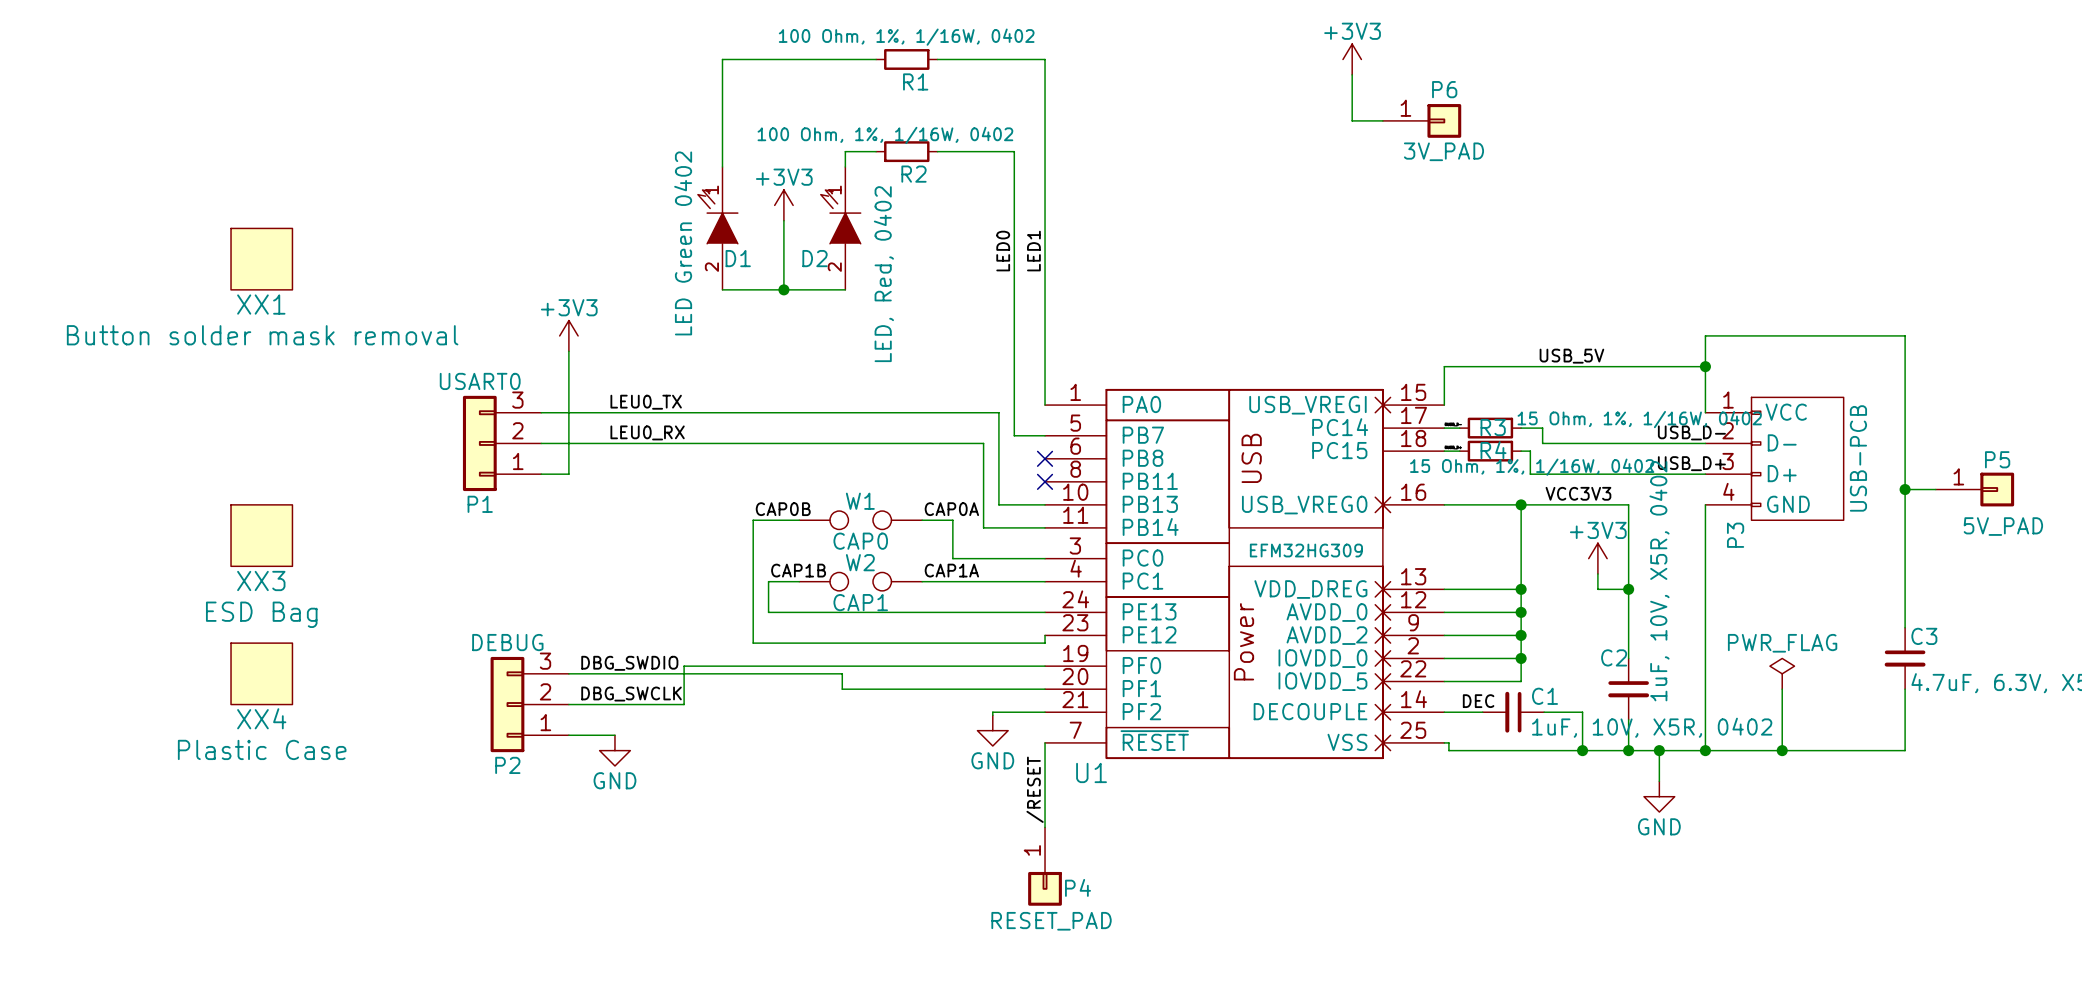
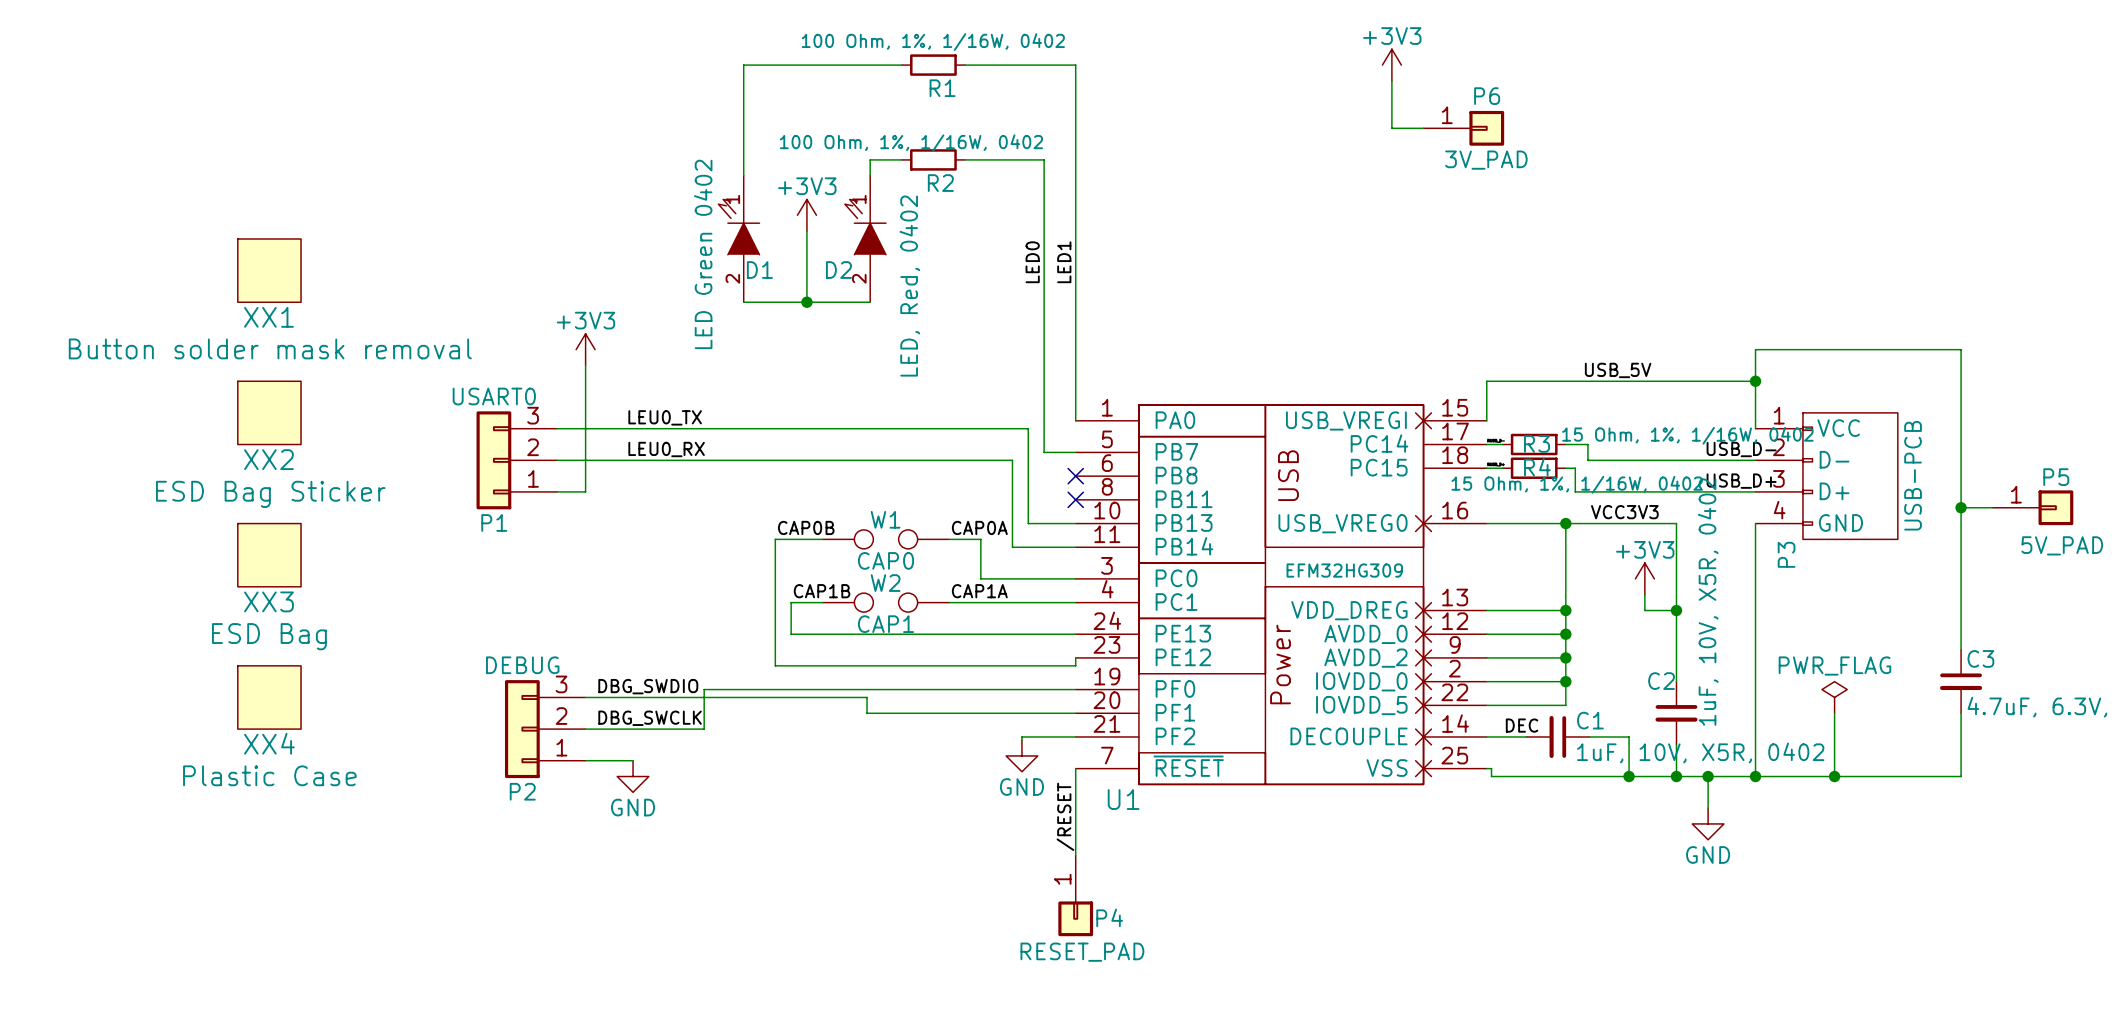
XX2: none -> ESD Bag Sticker (269, 412)

